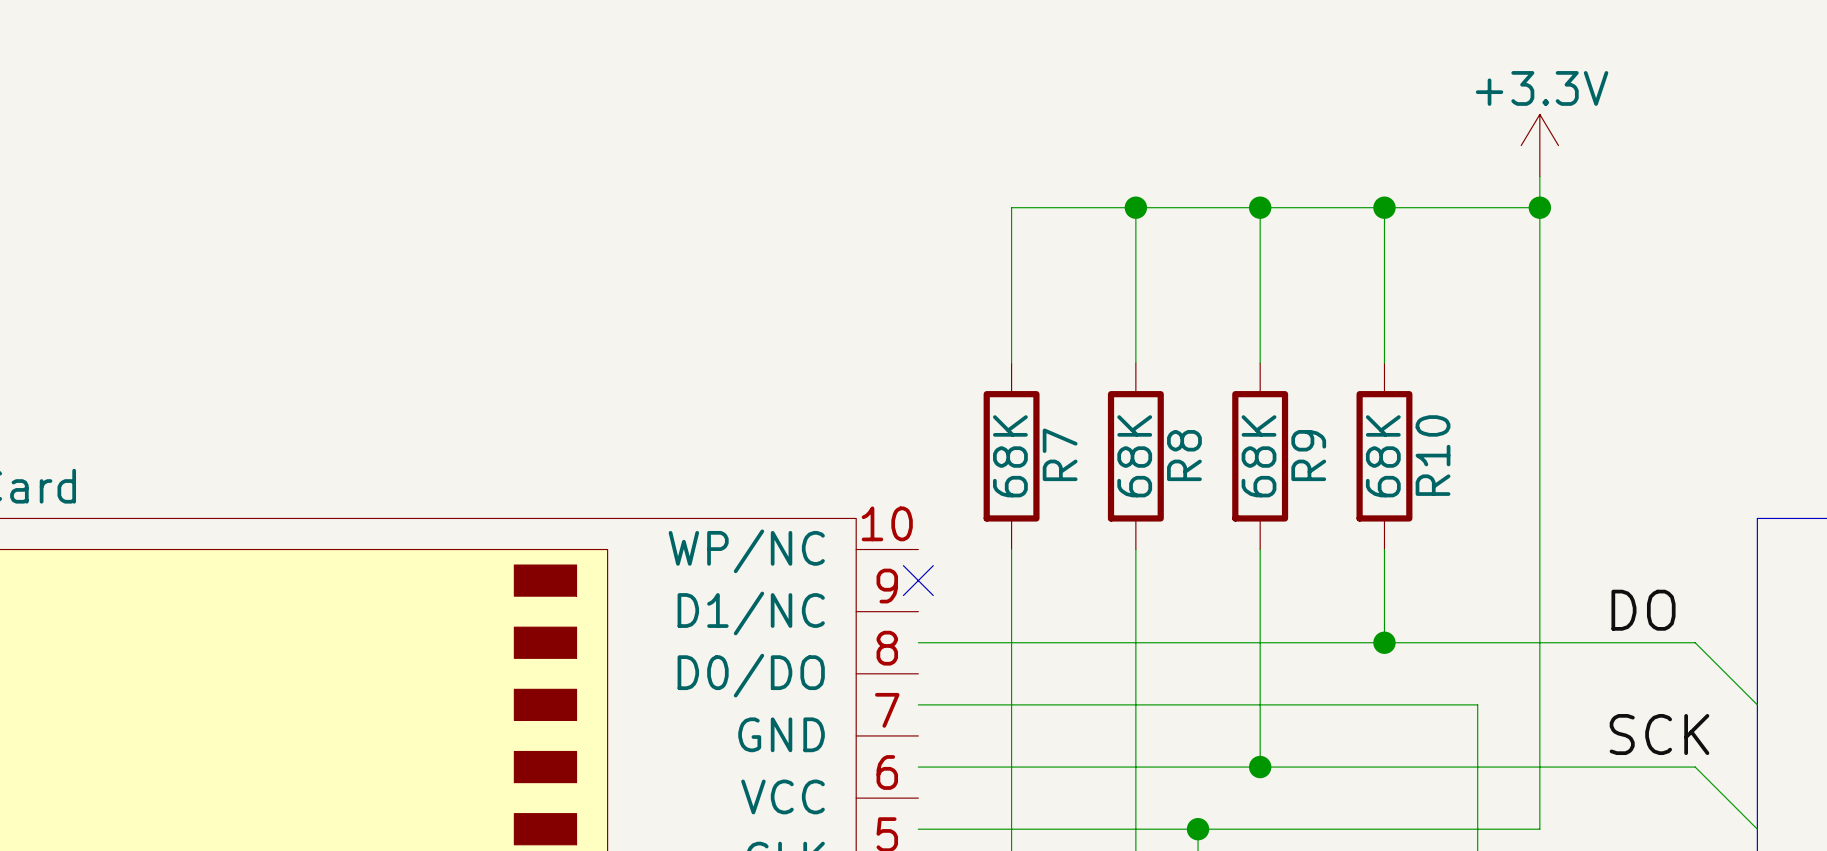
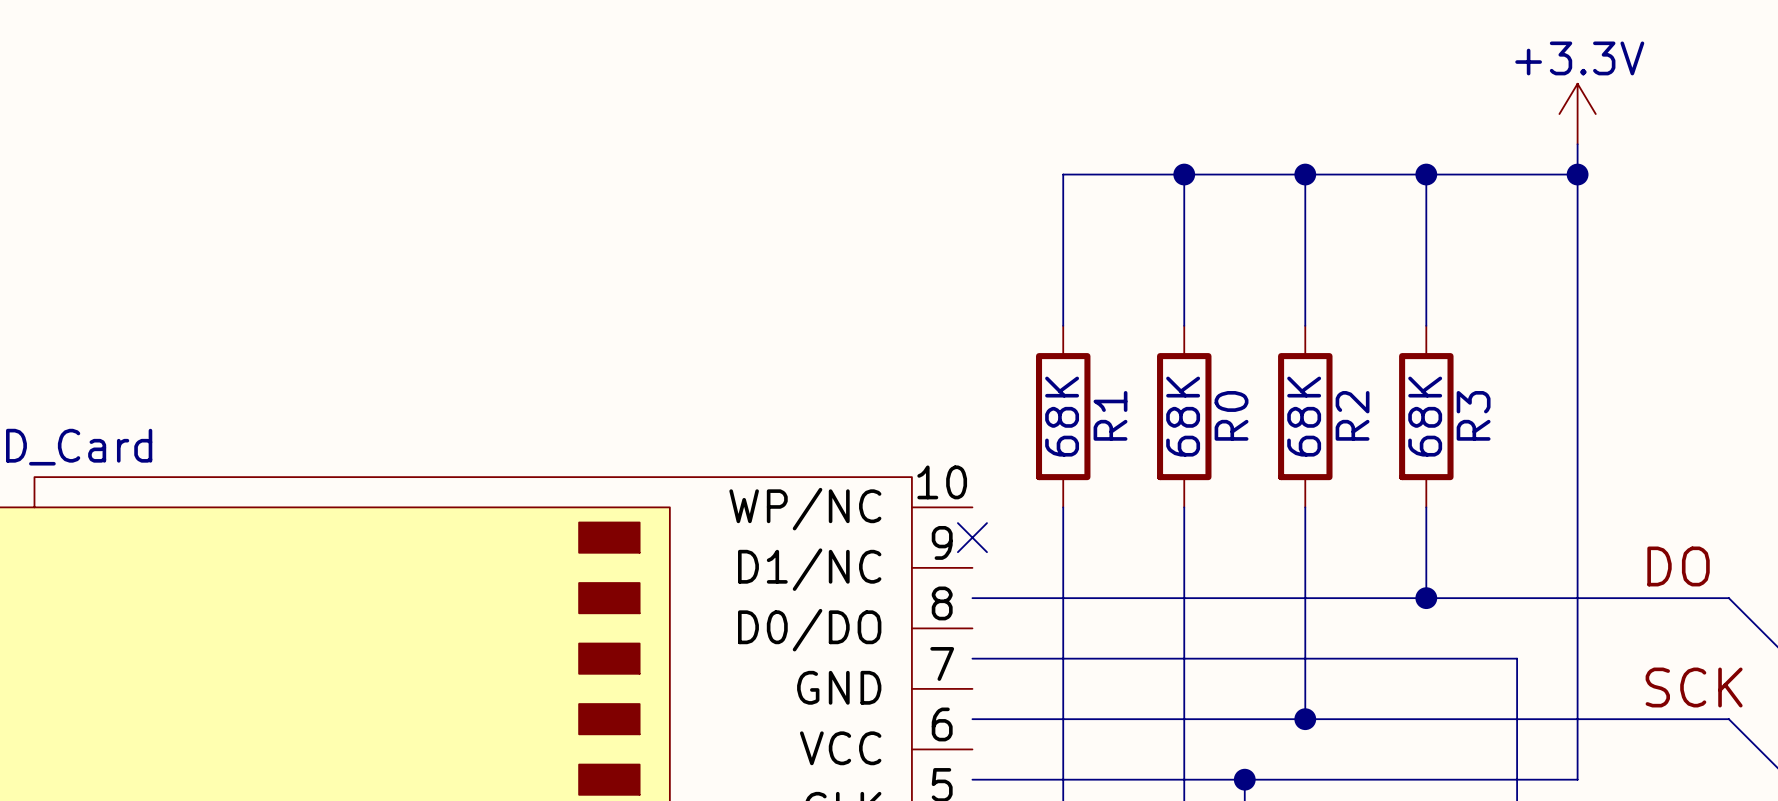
R7 name: R7 (1060, 454) -> R1 (1110, 415)
R8 name: R8 (1184, 455) -> R0 (1231, 415)
R9 name: R9 (1308, 455) -> R2 (1352, 415)
R10 name: R10 (1433, 455) -> R3 (1473, 415)

